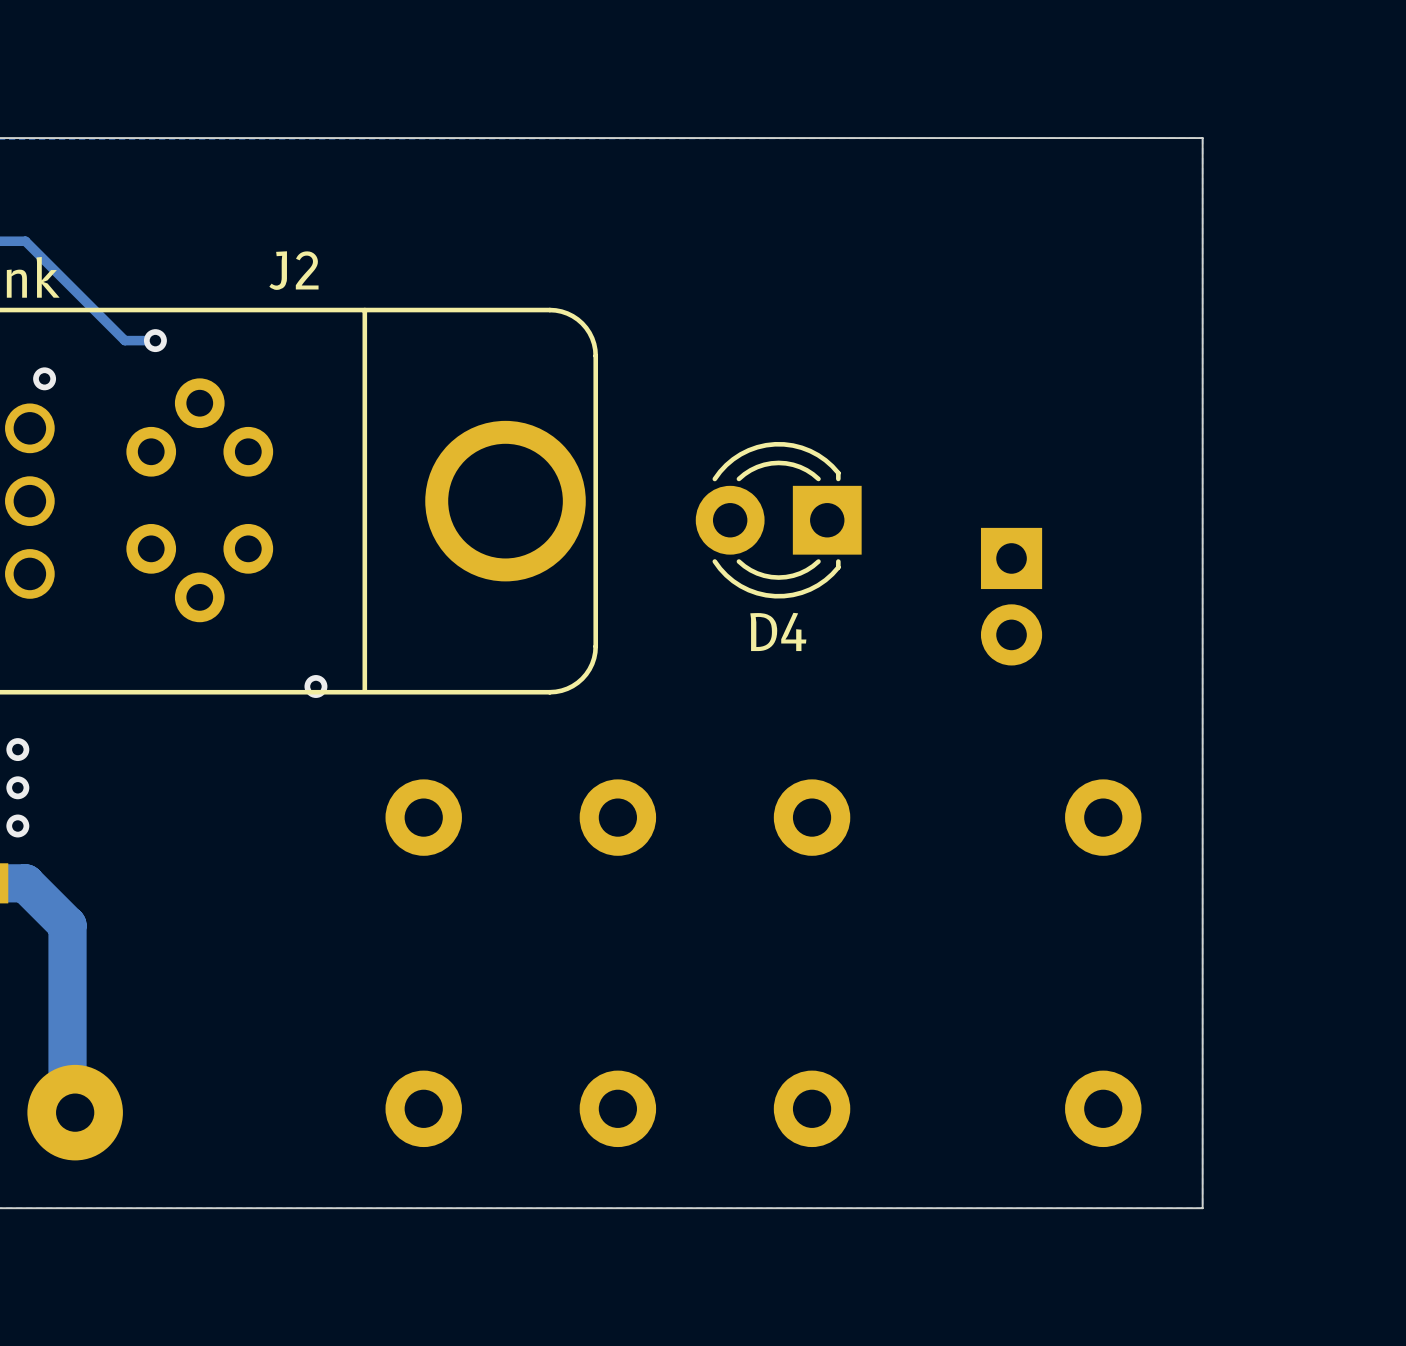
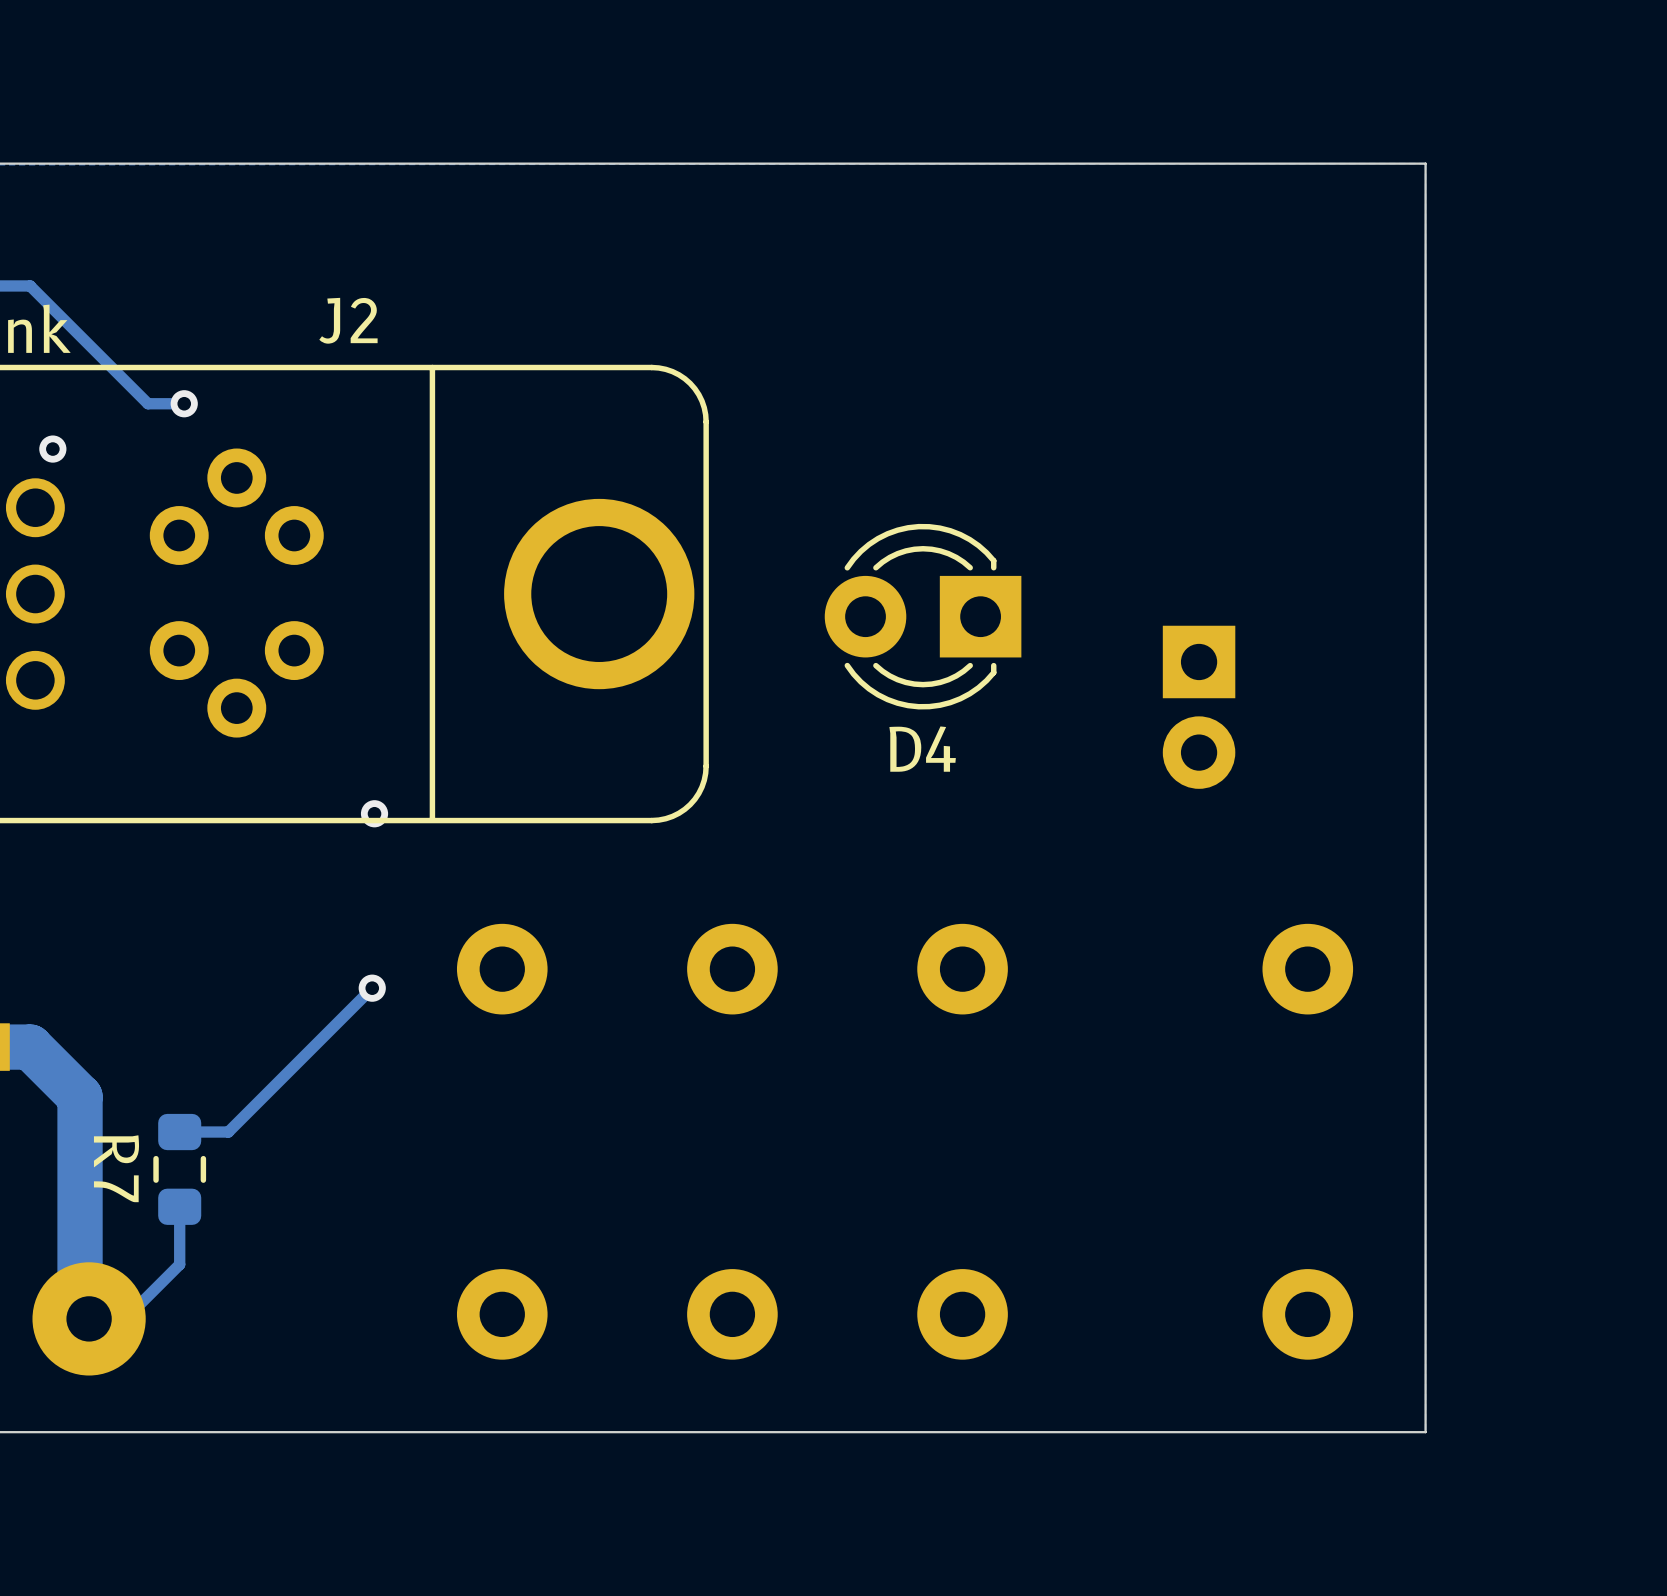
via: (17, 749) -> none
via: (17, 787) -> none
via: (17, 826) -> none
track: none -> (372, 988) (228, 1132) (179, 1132)
via: none -> (372, 988)
R7: none -> (179, 1169)
track: none -> (179, 1206) (179, 1264) (125, 1318)

